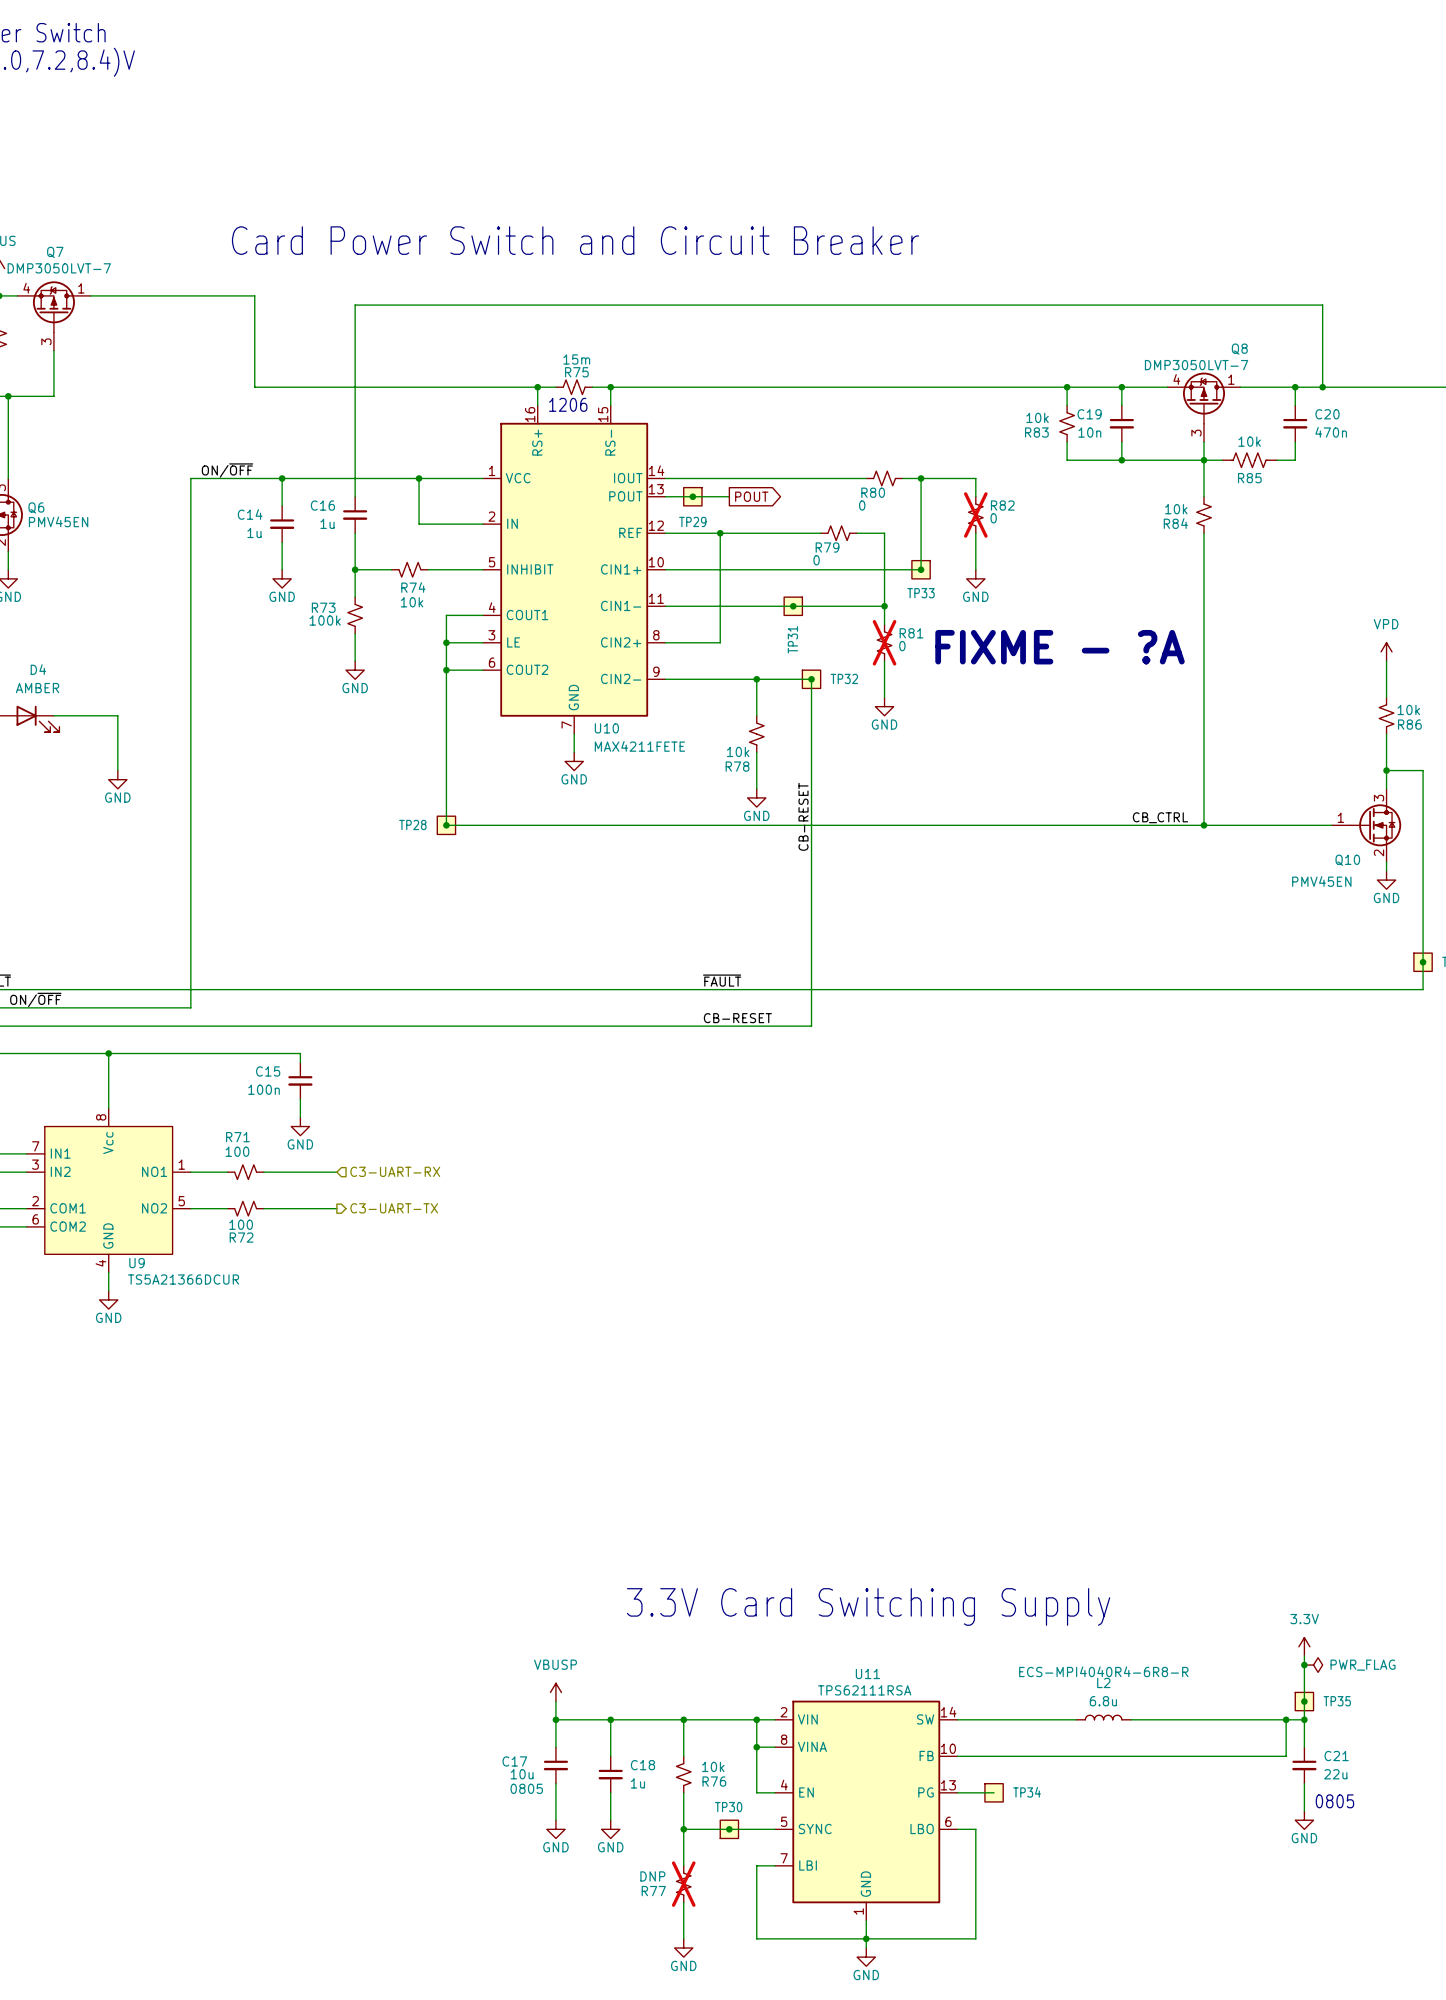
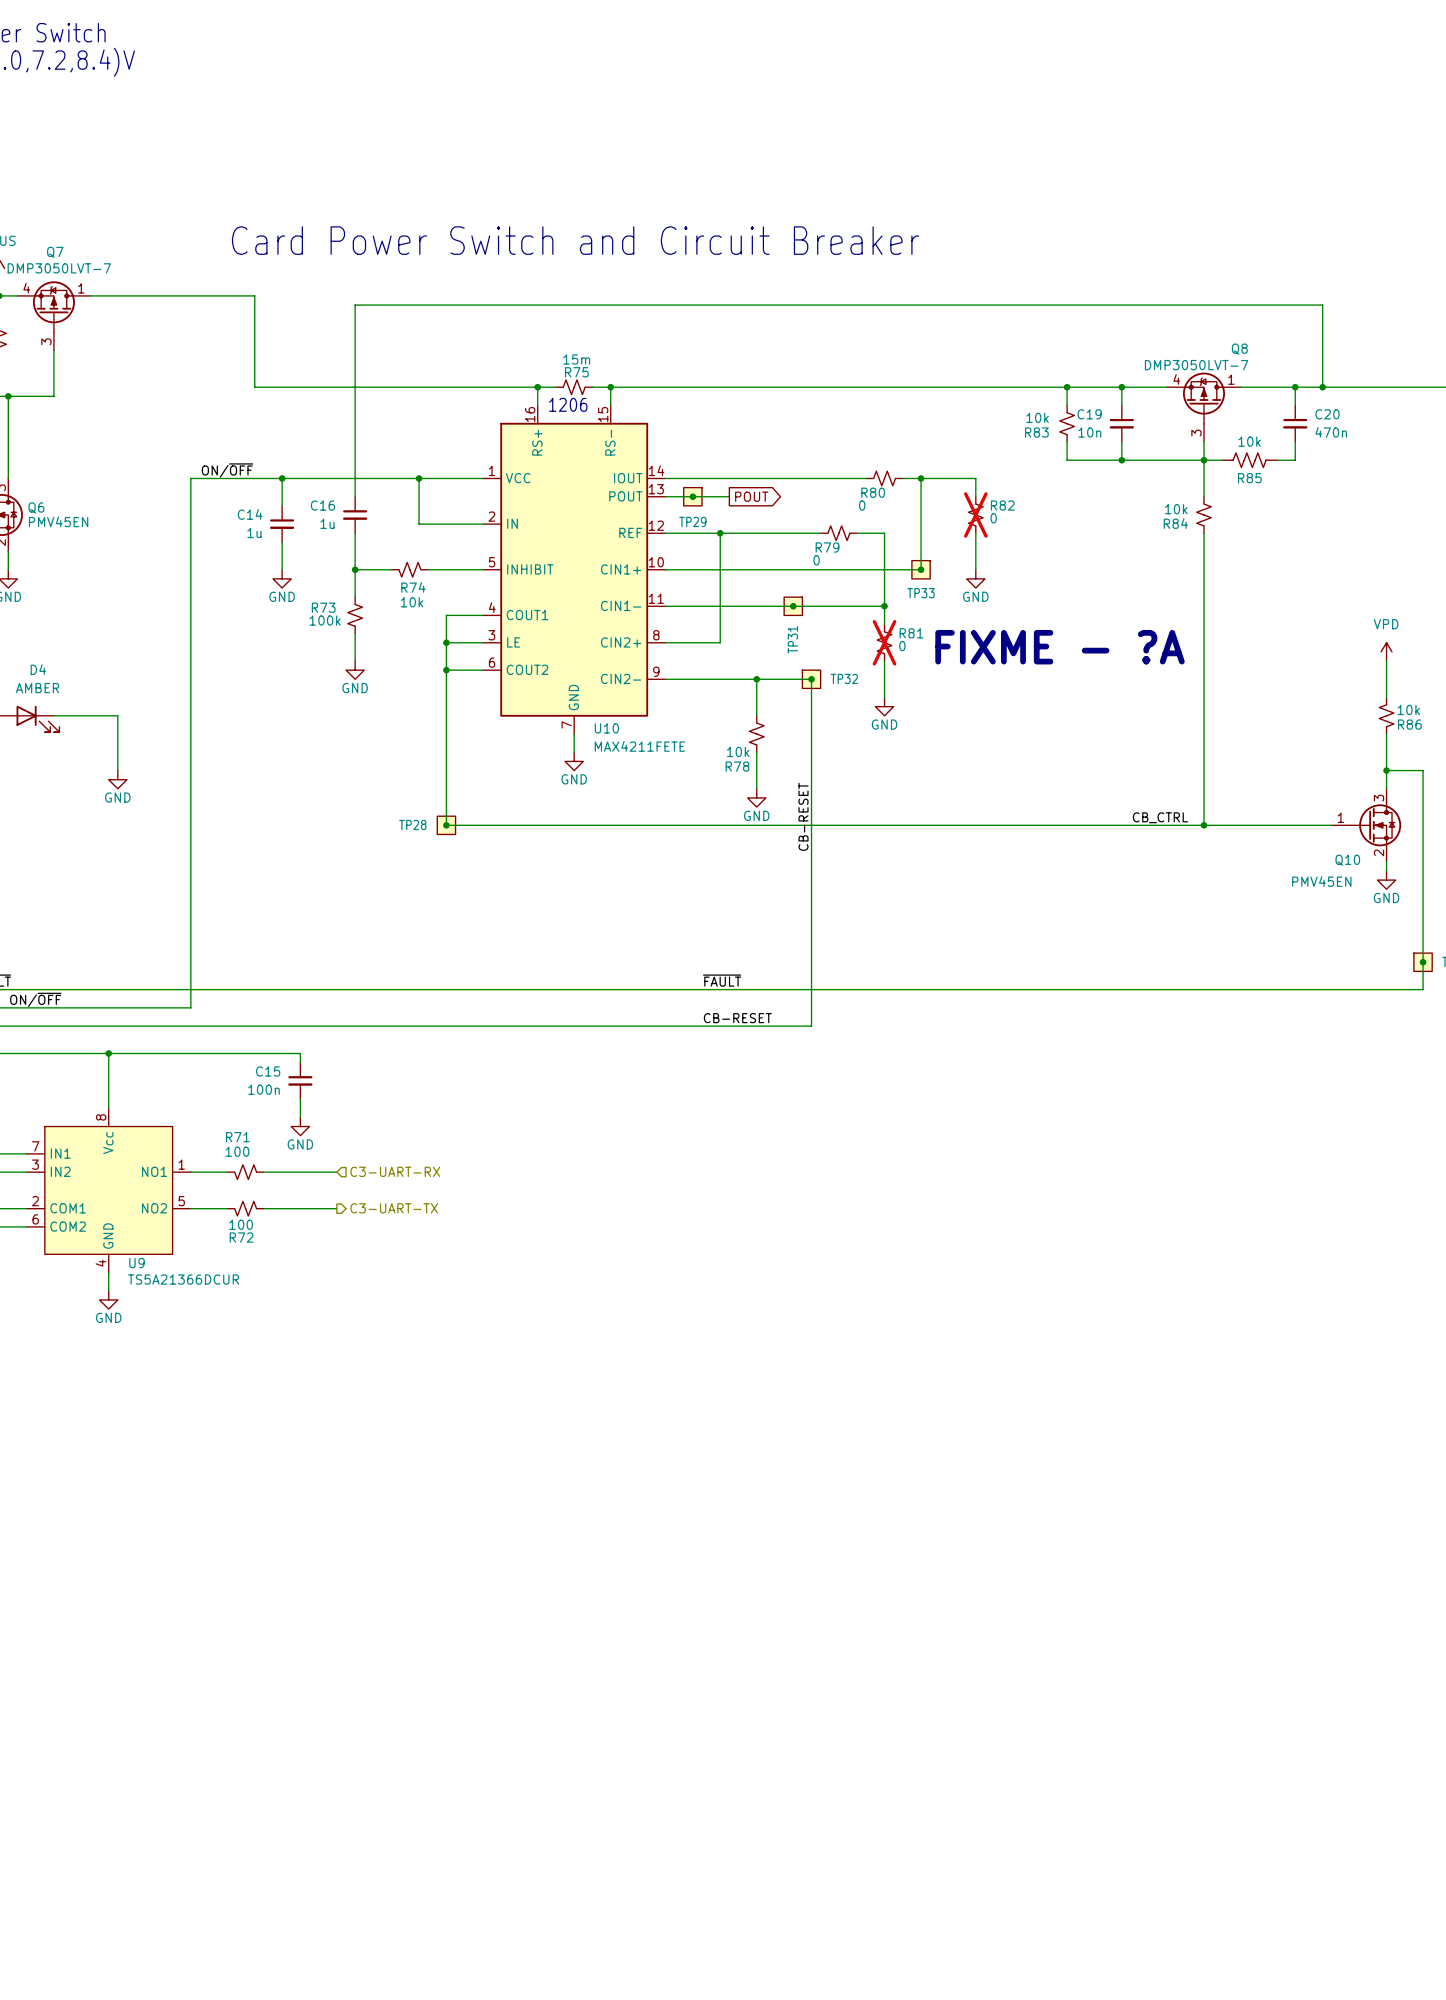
text: 3.3V Card Switching Supply (868, 1606) -> none
power symbol: 3.3V (1304, 1646) -> none
wire: (1304, 1655) (1304, 1747) -> none
junction: (1304, 1665) -> none
power symbol: PWR_FLAG (1313, 1665) -> none
power symbol: VBUSP (555, 1692) -> none
wire: (555, 1701) (555, 1747) -> none
junction: (1304, 1701) -> none
TP35: (1304, 1701) -> none
L2: 6.8u (1103, 1717) -> none
wire: (555, 1719) (775, 1719) -> none
junction: (555, 1719) -> none
wire: (610, 1719) (610, 1756) -> none
junction: (610, 1719) -> none
wire: (683, 1719) (683, 1756) -> none
junction: (683, 1719) -> none
wire: (756, 1719) (756, 1792) (775, 1792) -> none
junction: (756, 1719) -> none
wire: (957, 1719) (1076, 1719) -> none
wire: (1130, 1719) (1304, 1719) -> none
wire: (1286, 1719) (1286, 1756) (957, 1756) -> none
junction: (1286, 1719) -> none
junction: (1304, 1719) -> none
wire: (756, 1747) (775, 1747) -> none
junction: (756, 1747) -> none
C17: 10u (555, 1765) -> none
C21: 22u (1304, 1765) -> none
C18: 1u (610, 1774) -> none
R76: 10k (683, 1774) -> none
wire: (555, 1783) (555, 1820) -> none
wire: (1304, 1783) (1304, 1811) -> none
wire: (610, 1792) (610, 1820) -> none
wire: (683, 1792) (683, 1865) -> none
wire: (957, 1792) (994, 1792) -> none
TP34: (994, 1792) -> none
text: 0805 (1334, 1801) -> none
U11: TPS62111RSA (866, 1810) -> none
power symbol: GND (1304, 1820) -> none
power symbol: GND (555, 1829) -> none
power symbol: GND (610, 1829) -> none
wire: (683, 1829) (775, 1829) -> none
junction: (683, 1829) -> none
junction: (729, 1829) -> none
TP30: (729, 1829) -> none
wire: (957, 1829) (975, 1829) (975, 1938) (756, 1938) (756, 1865) (775, 1865) -> none
R77: DNP (683, 1884) -> none
wire: (683, 1902) (683, 1938) -> none
wire: (866, 1920) (866, 1947) -> none
junction: (866, 1938) -> none
power symbol: GND (683, 1947) -> none
power symbol: GND (866, 1957) -> none

